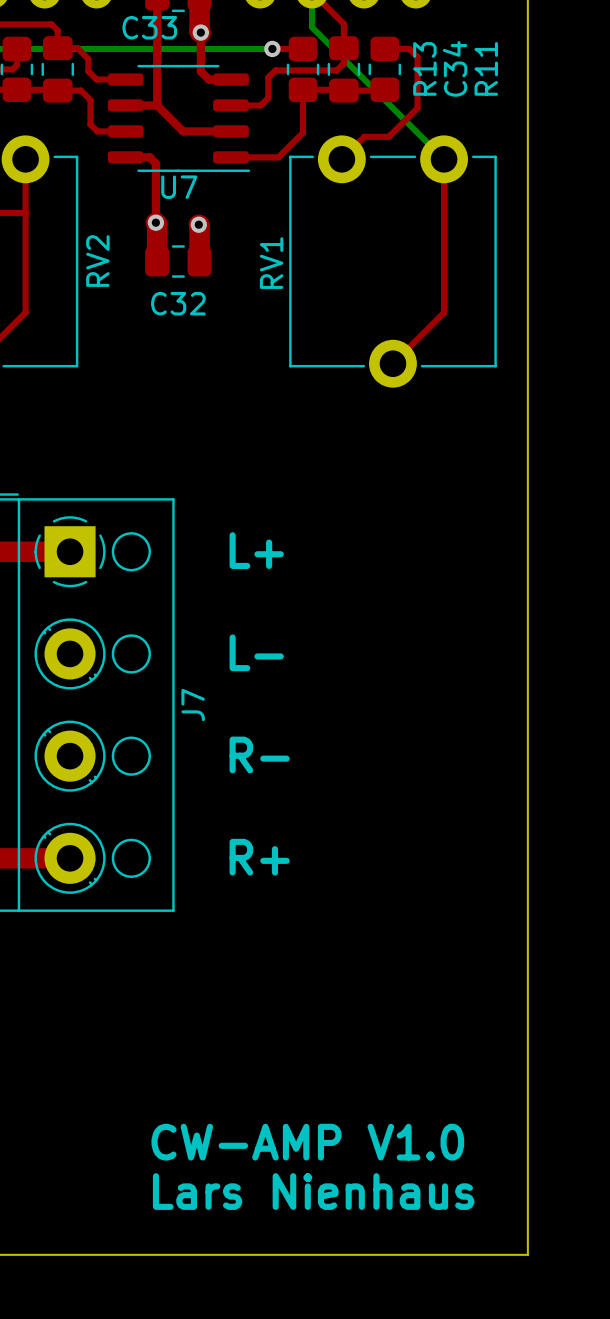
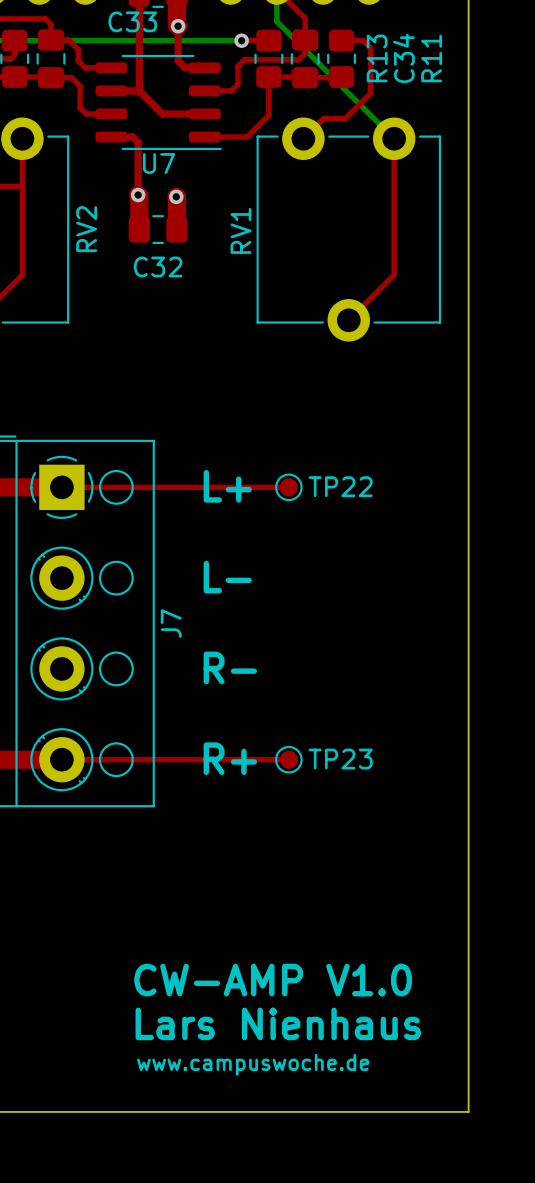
top track: none -> (61, 487) (288, 487)
TP22: none -> (288, 487)
top track: none -> (61, 759) (288, 759)
TP23: none -> (288, 759)
text: none -> CW-AMP V1.0 (273, 980)
text: CW-AMP V1.0 (307, 1142) -> Lars Nienhaus (278, 1023)
text: Lars Nienhaus (313, 1191) -> www.campuswoche.de (253, 1064)

